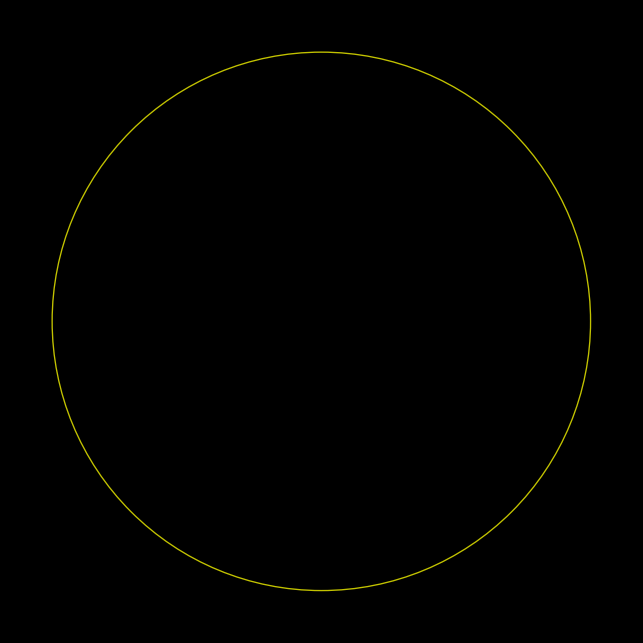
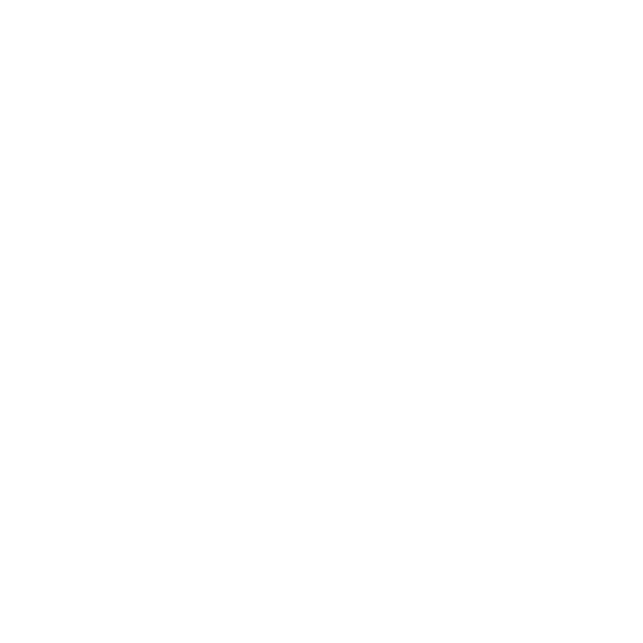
round board edge: [51, 51, 592, 592] -> none

